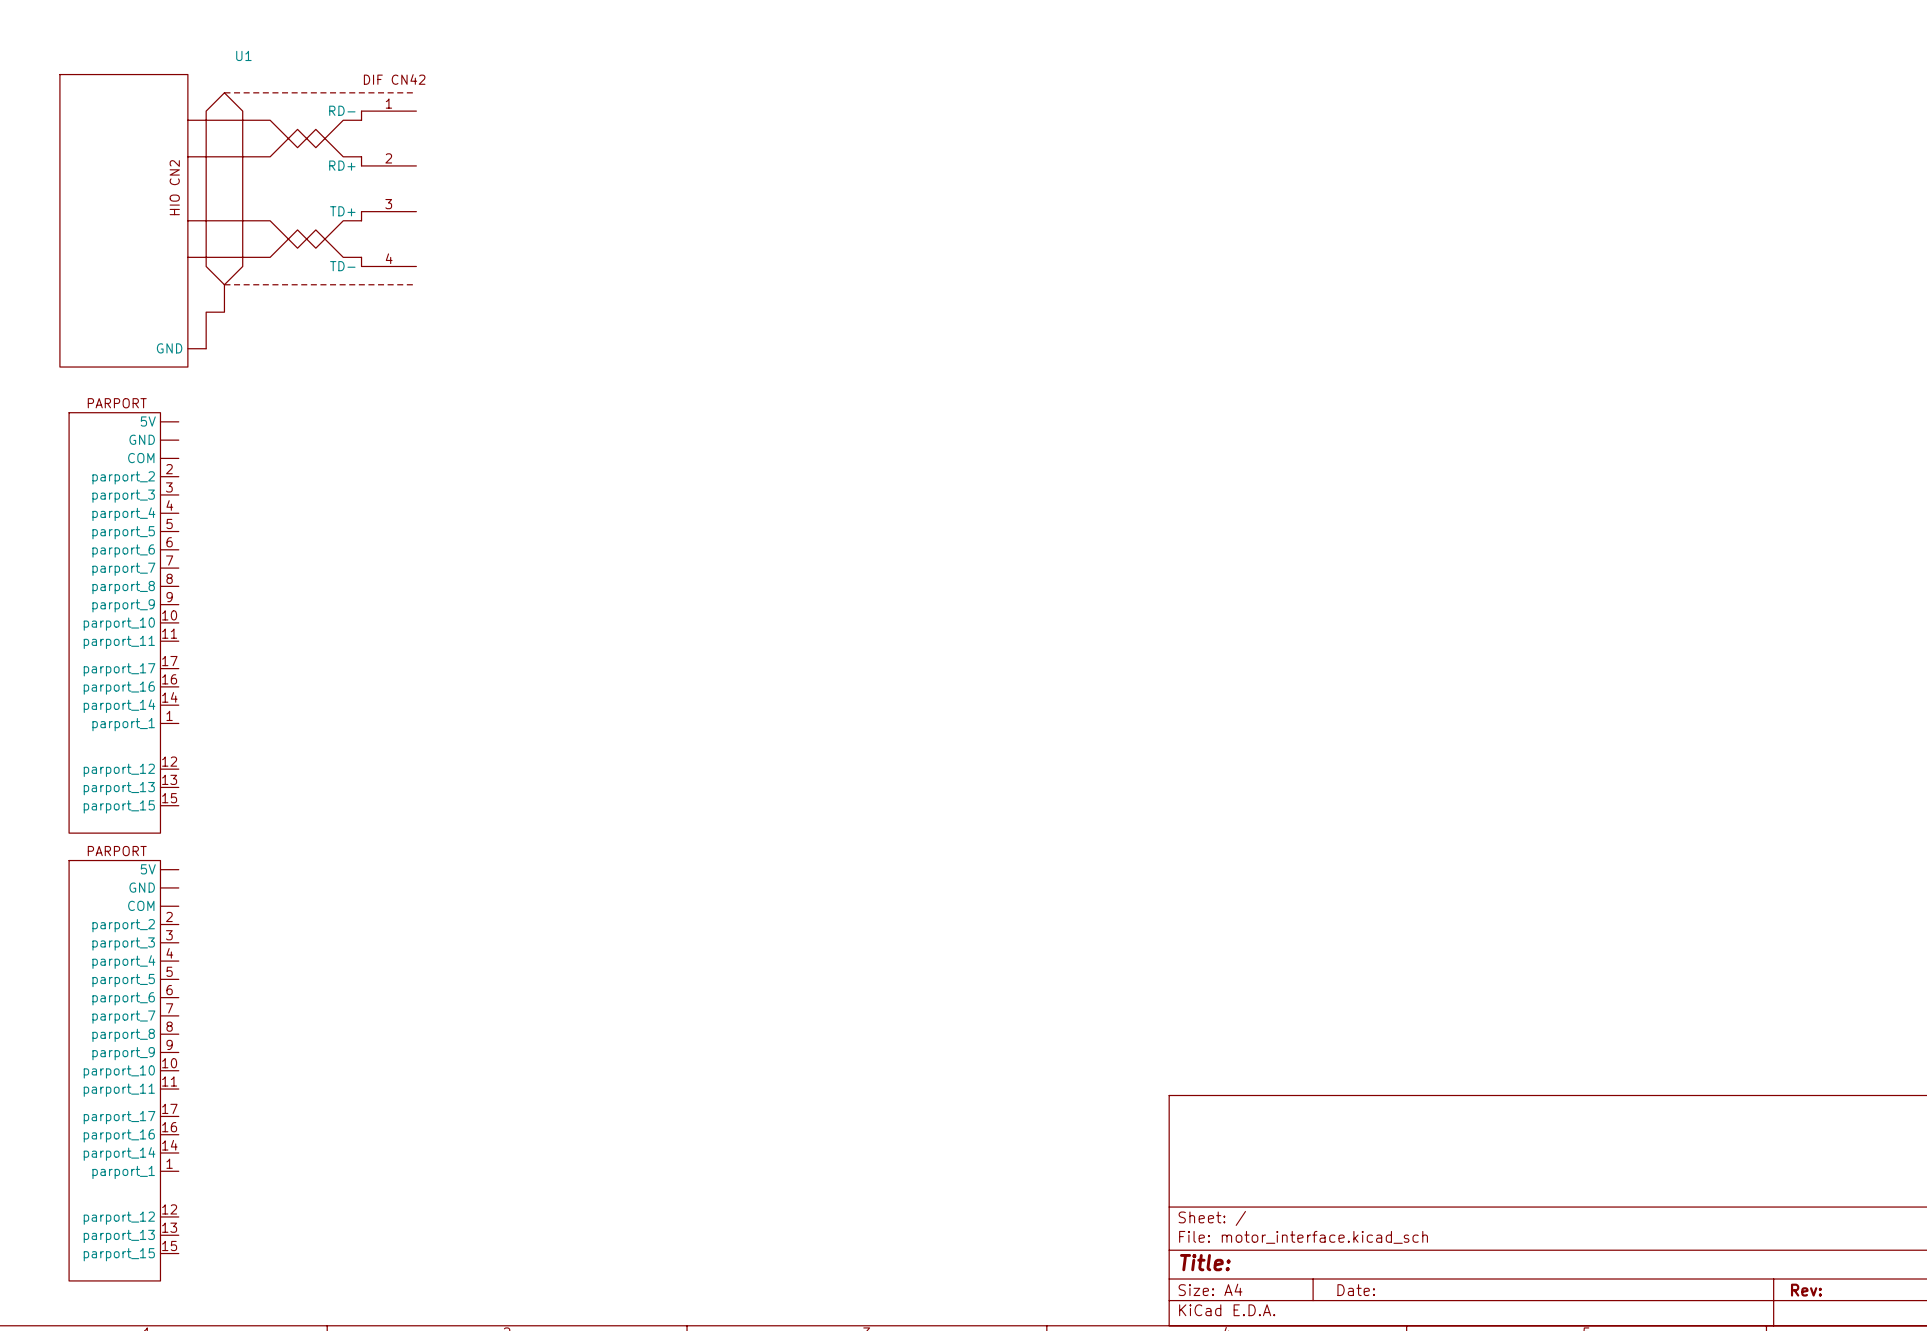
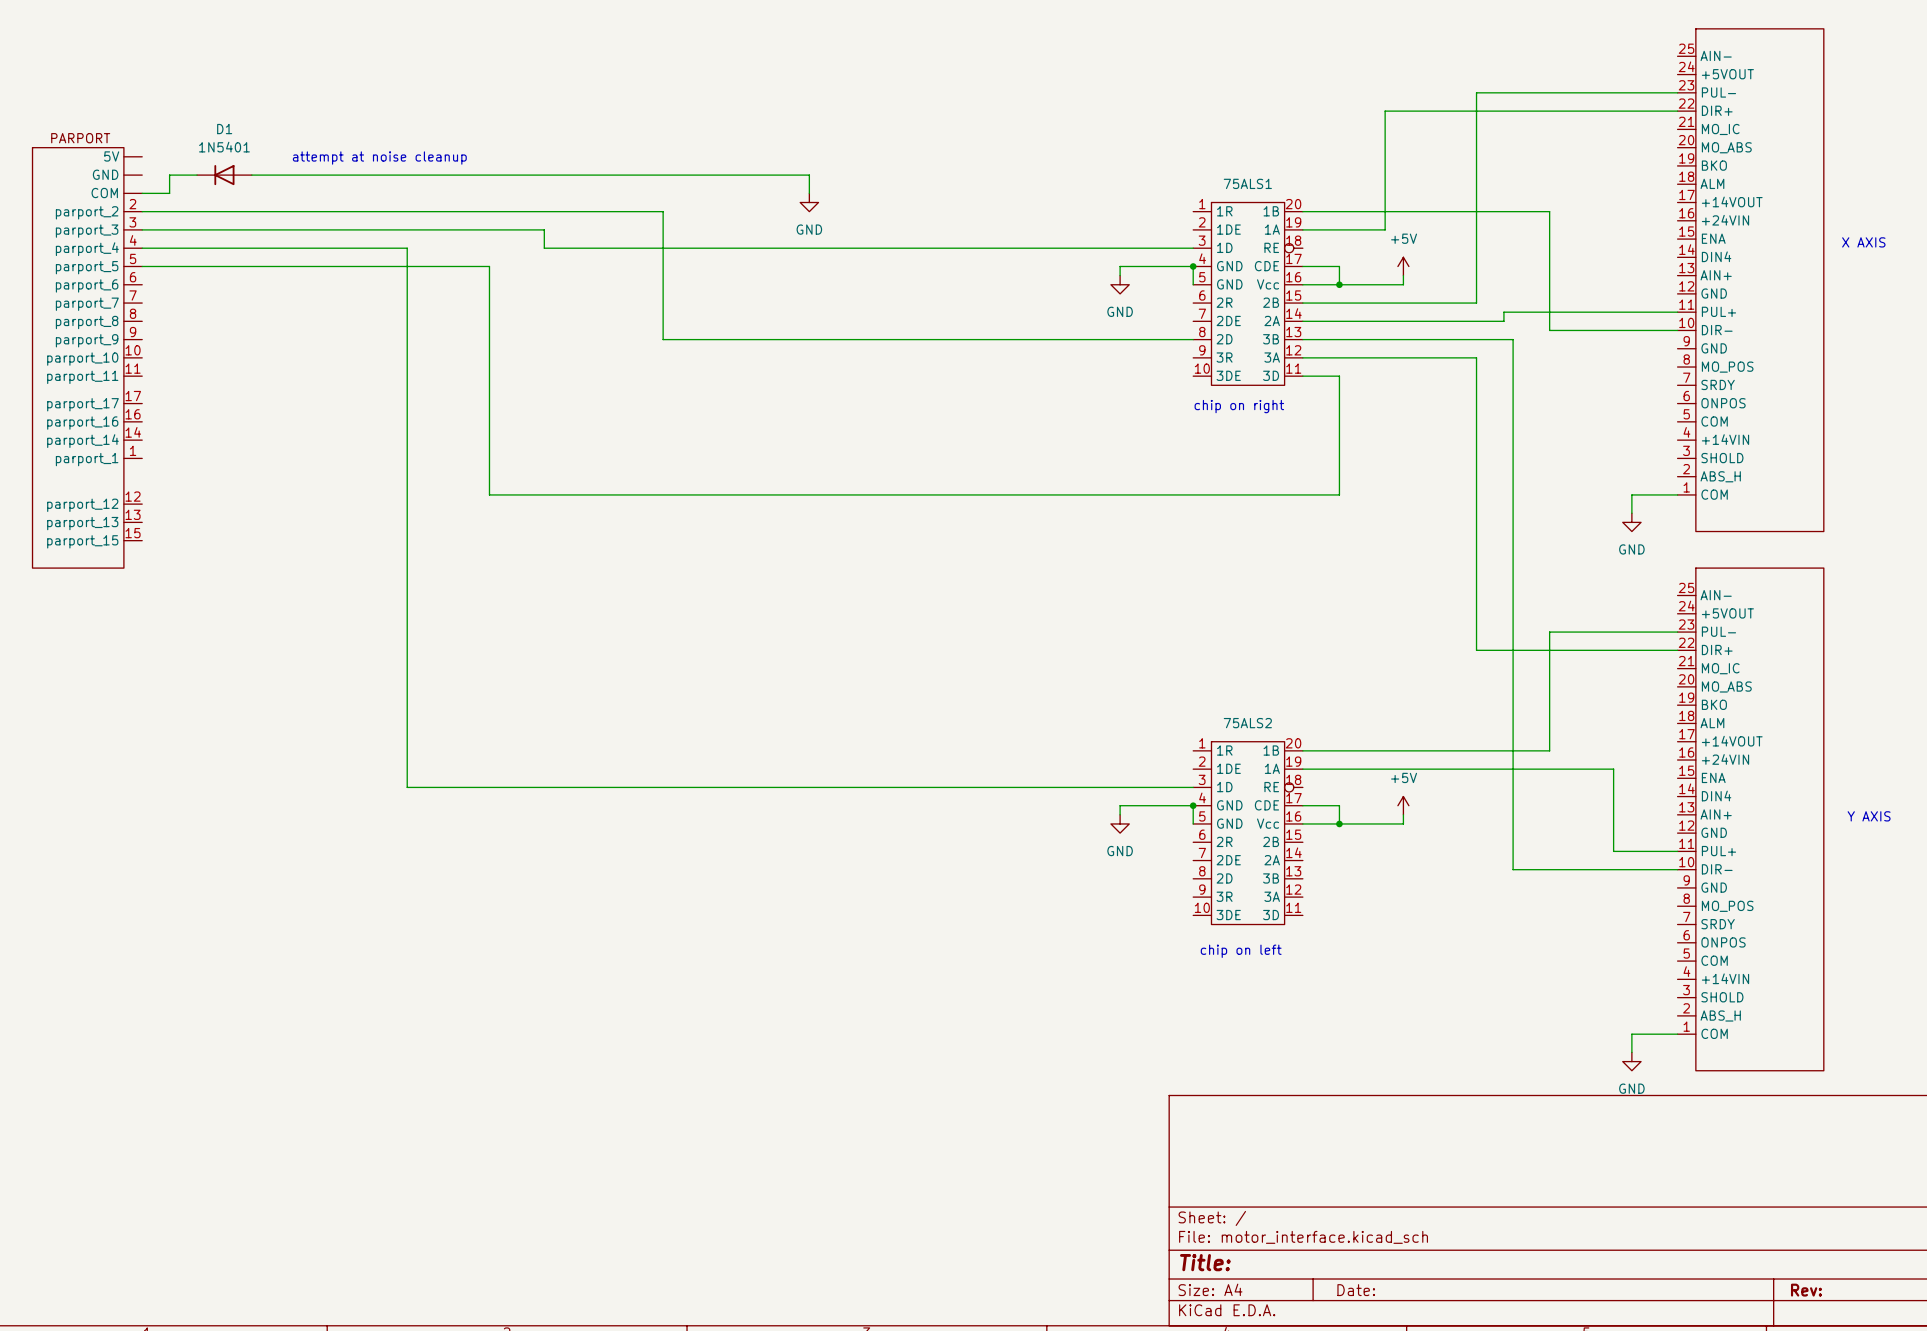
wire: none -> (1677, 92) (1476, 92) (1476, 303) (1302, 303)
wire: none -> (1677, 111) (1385, 111) (1385, 229) (1302, 229)
text: none -> attempt at noise cleanup (379, 158)
wire: none -> (197, 175) (169, 175) (169, 193) (142, 193)
D1: none -> 1N5401 (224, 175)
wire: none -> (251, 175) (809, 175) (809, 193)
power symbol: none -> GND (809, 202)
wire: none -> (142, 211) (663, 211) (663, 339) (1193, 339)
wire: none -> (1302, 211) (1549, 211) (1549, 330) (1677, 330)
U1: (238, 220) -> none
wire: none -> (142, 229) (544, 229) (544, 248) (1193, 248)
text: none -> X AXIS (1863, 242)
wire: none -> (142, 248) (407, 248) (407, 787) (1193, 787)
wire: none -> (142, 266) (489, 266) (489, 494) (1339, 494) (1339, 376) (1302, 376)
junction: none -> (1193, 266)
wire: none -> (1302, 266) (1339, 266) (1339, 284)
power symbol: none -> +5V (1403, 266)
wire: none -> (1120, 275) (1120, 266) (1193, 266) (1193, 284)
wire: none -> (1403, 275) (1403, 284) (1302, 284)
part: none -> (1750, 280)
power symbol: none -> GND (1120, 284)
junction: none -> (1339, 284)
75ALS1: none -> (1248, 293)
wire: none -> (1677, 312) (1503, 312) (1503, 321) (1302, 321)
wire: none -> (1302, 339) (1513, 339) (1513, 869) (1677, 869)
part: none -> (87, 357)
wire: none -> (1302, 357) (1476, 357) (1476, 650) (1677, 650)
text: none -> chip on right (1239, 406)
wire: none -> (1677, 494) (1631, 494) (1631, 513)
power symbol: none -> GND (1631, 522)
part: (123, 622) -> none
wire: none -> (1677, 632) (1549, 632) (1549, 750) (1302, 750)
wire: none -> (1302, 769) (1613, 769) (1613, 851) (1677, 851)
junction: none -> (1193, 805)
wire: none -> (1302, 805) (1339, 805) (1339, 823)
power symbol: none -> +5V (1403, 805)
wire: none -> (1120, 814) (1120, 805) (1193, 805) (1193, 823)
wire: none -> (1403, 814) (1403, 823) (1302, 823)
text: none -> Y AXIS (1869, 816)
part: none -> (1750, 819)
power symbol: none -> GND (1120, 823)
junction: none -> (1339, 823)
75ALS2: none -> (1248, 833)
text: none -> chip on left (1241, 951)
wire: none -> (1677, 1034) (1631, 1034) (1631, 1052)
power symbol: none -> GND (1631, 1061)
part: (123, 1070) -> none

